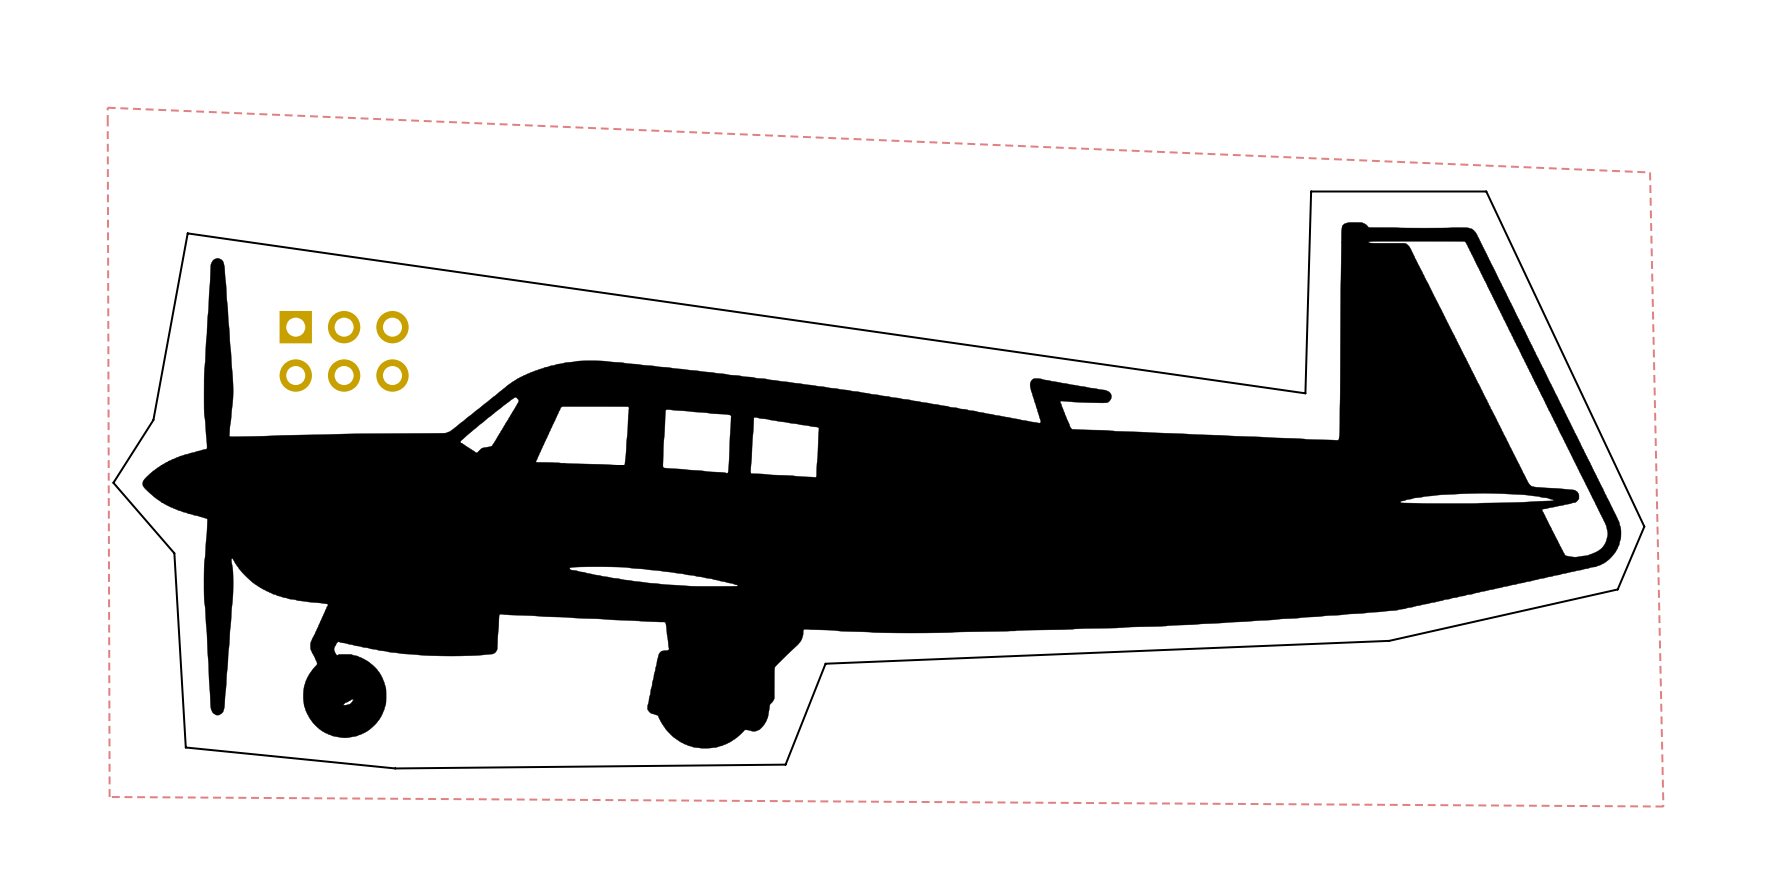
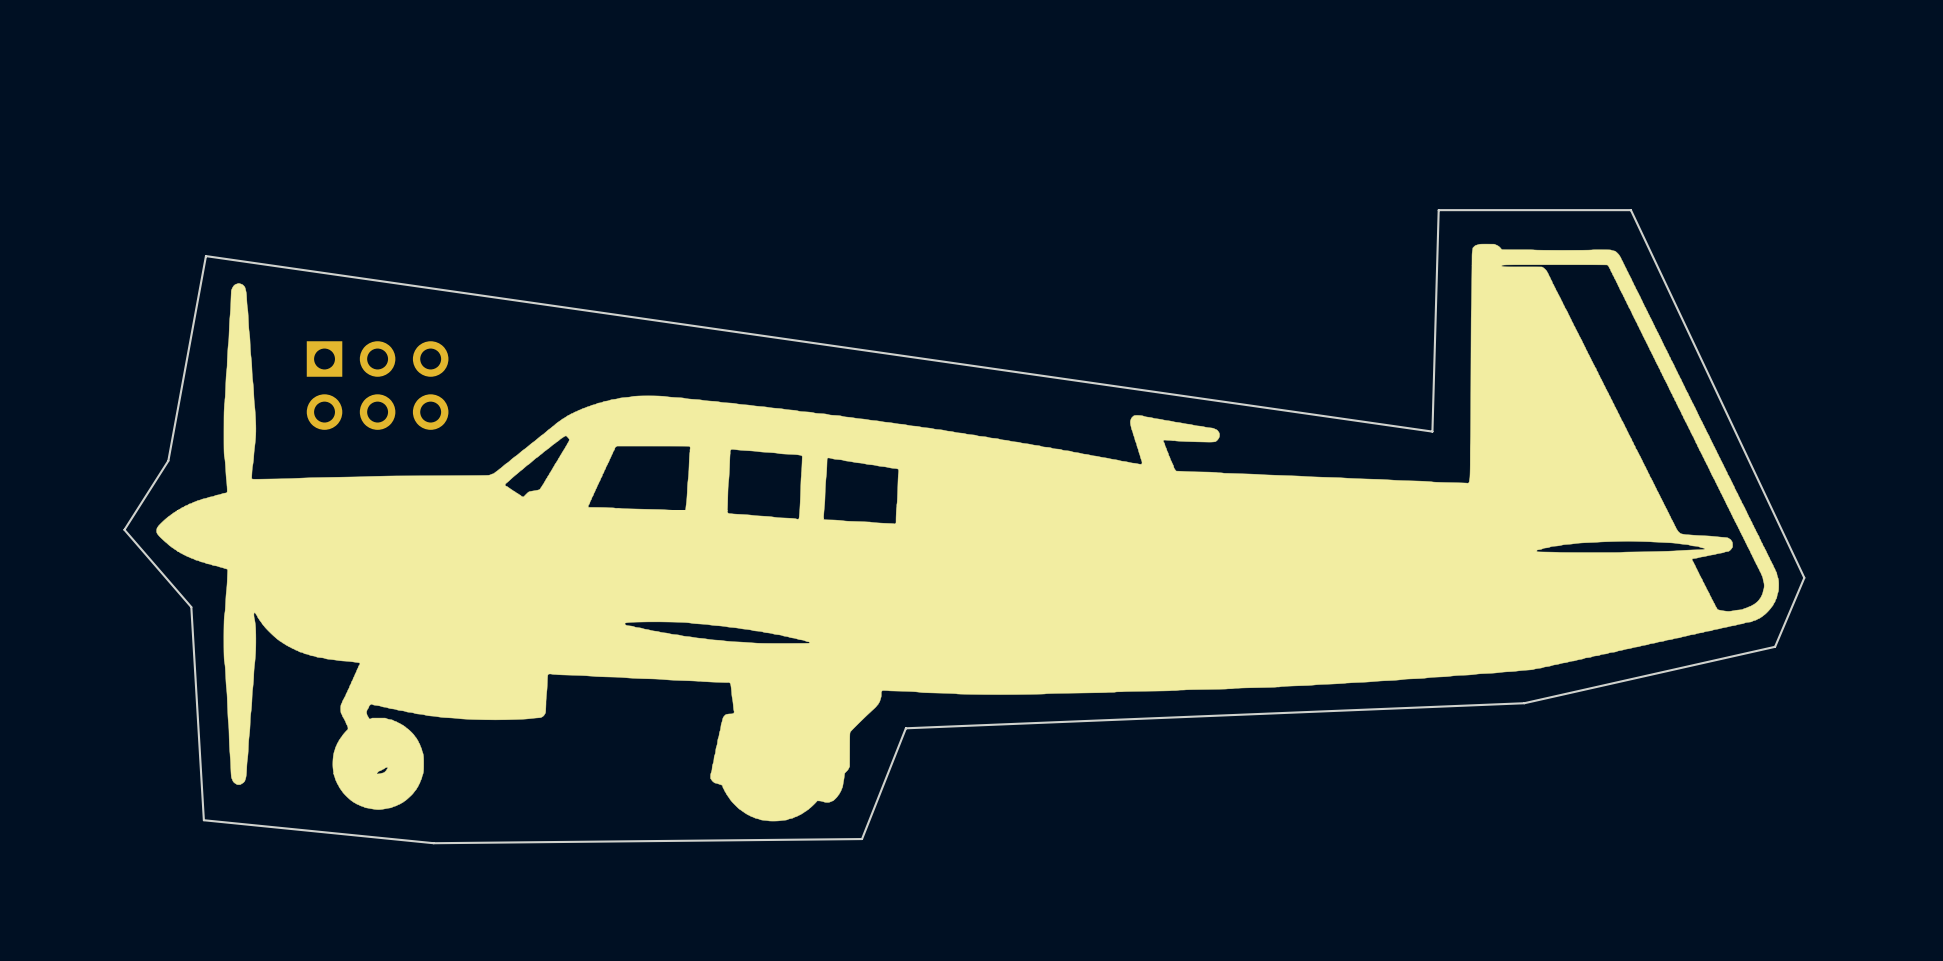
zone outline: (107, 107) (109, 797) (1663, 806) (1650, 172) (107, 107) -> none

